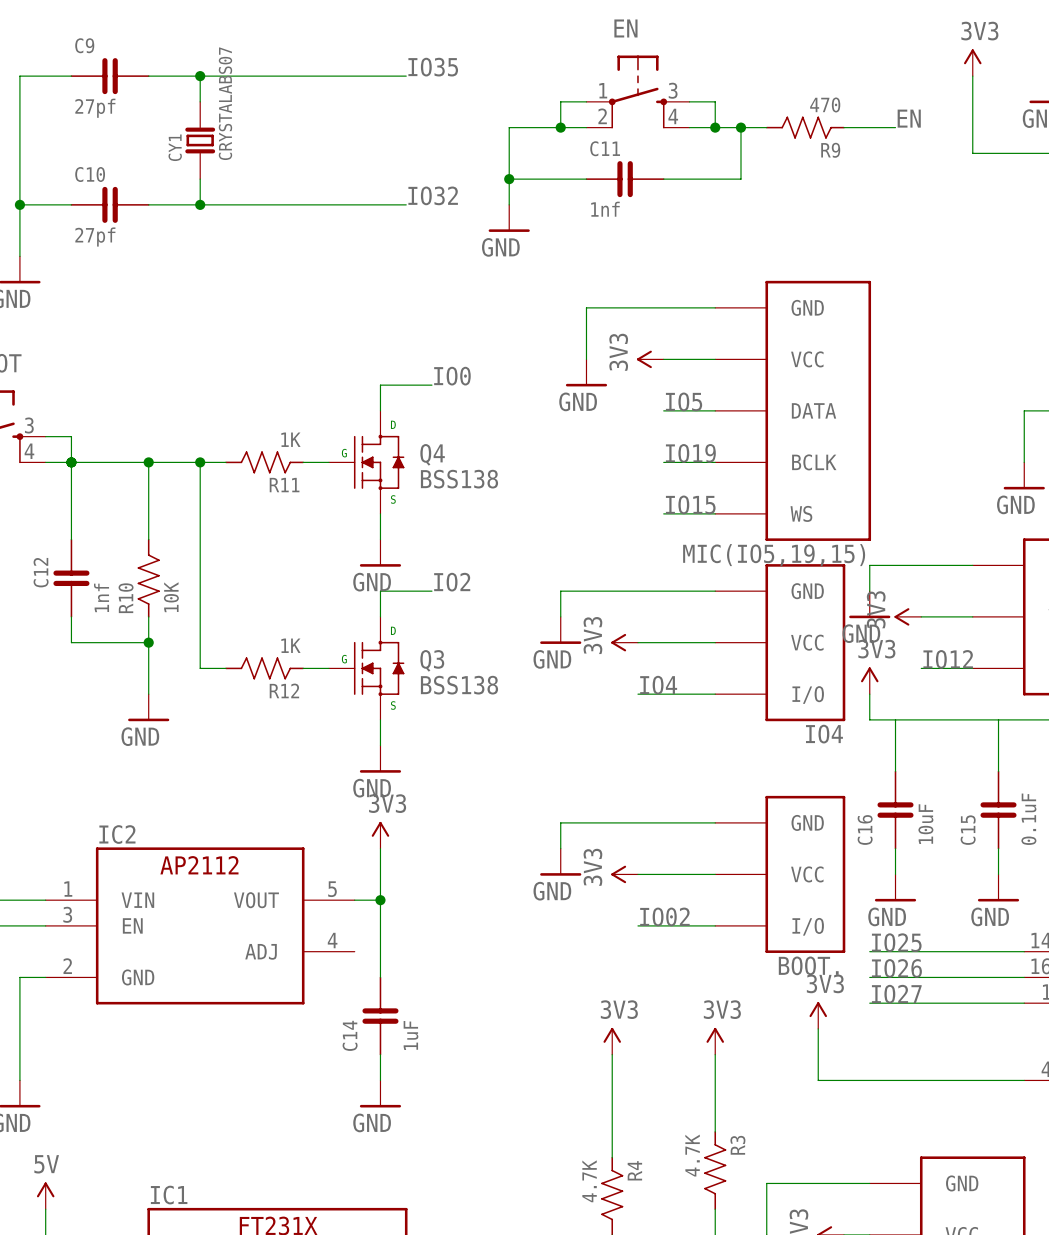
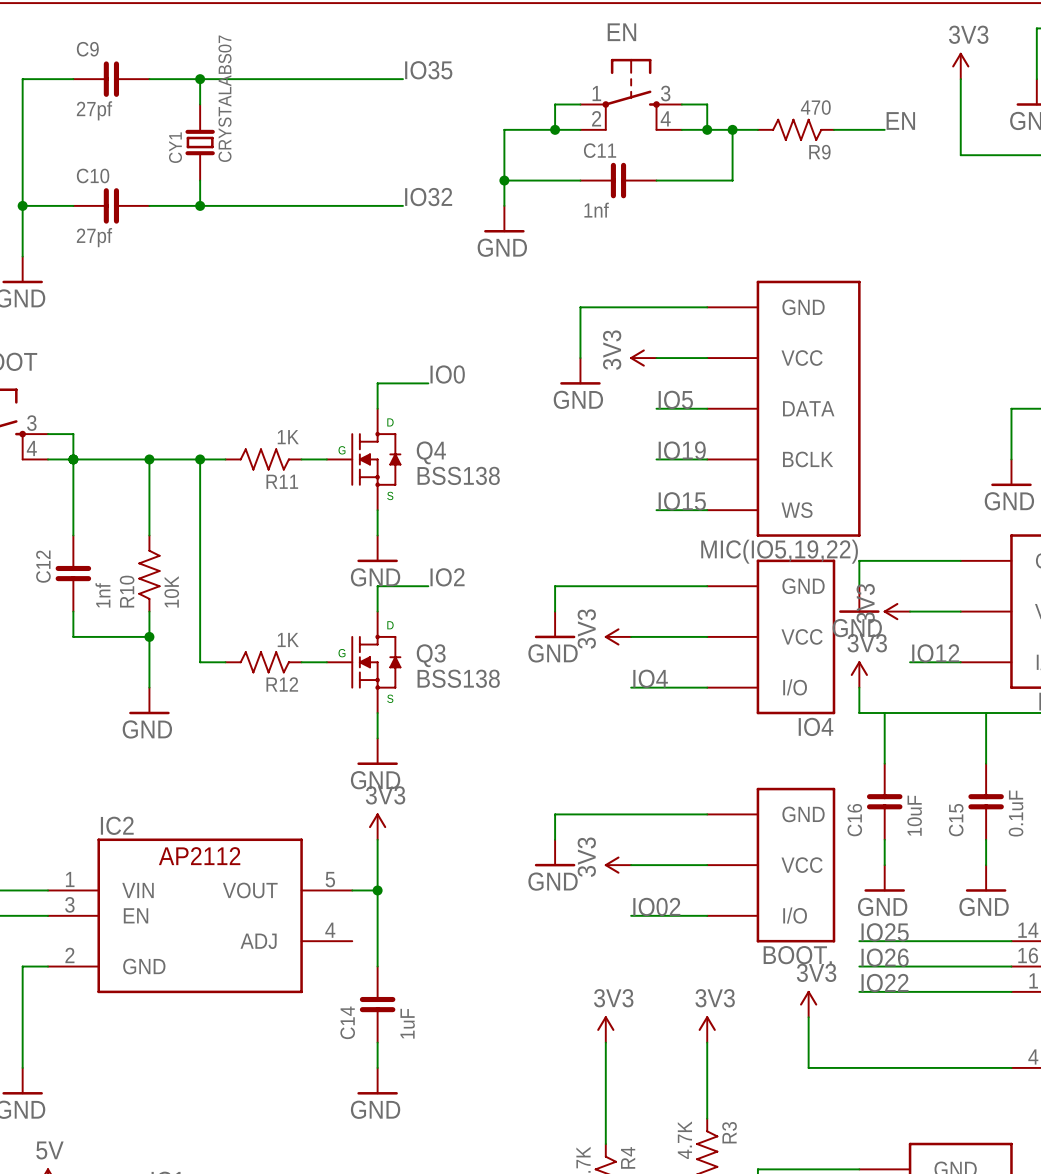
MIC(IO5,19,15) name: MIC(IO5,19,15) (774, 555) -> MIC(IO5,19,22) (779, 551)
label: IO27 (896, 994) -> IO22 (885, 983)

